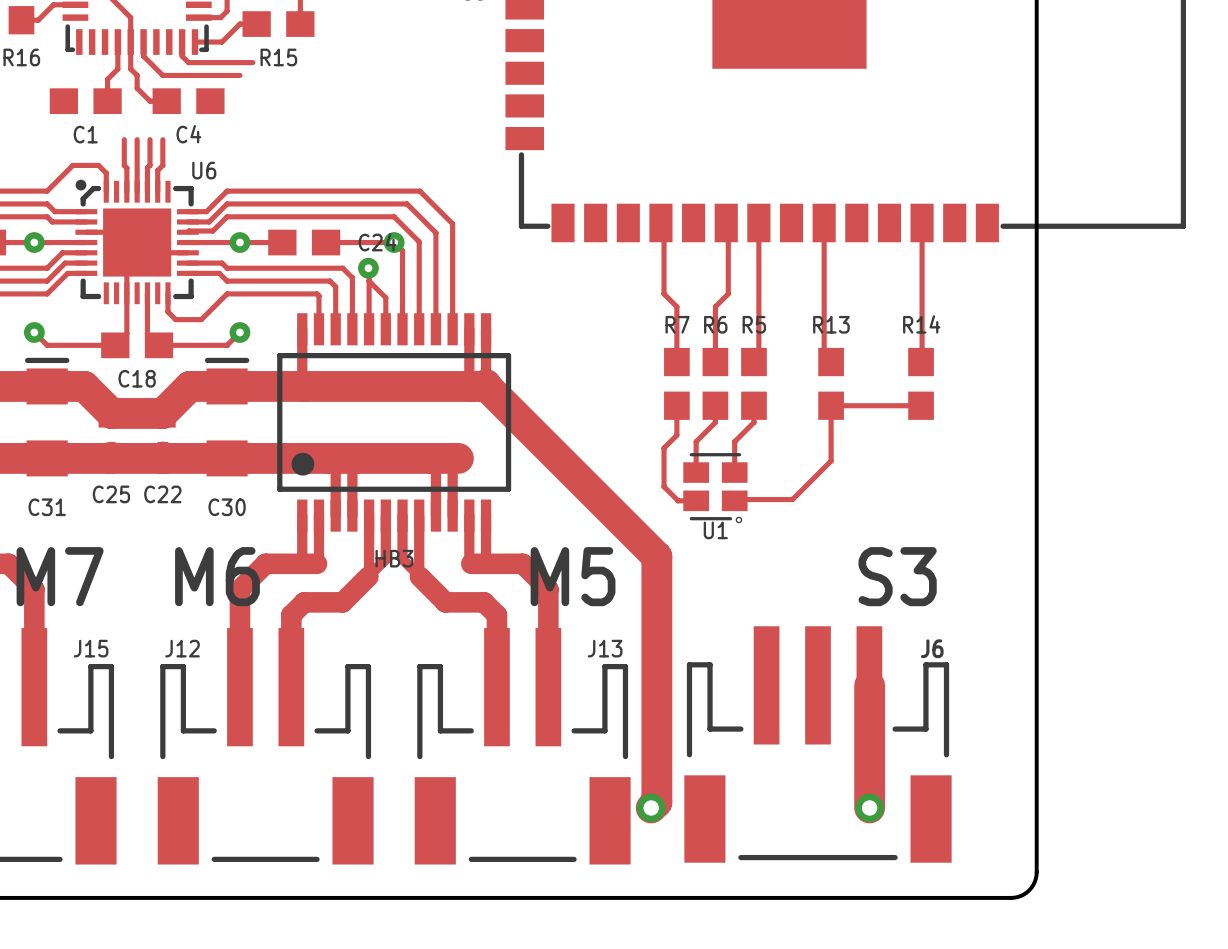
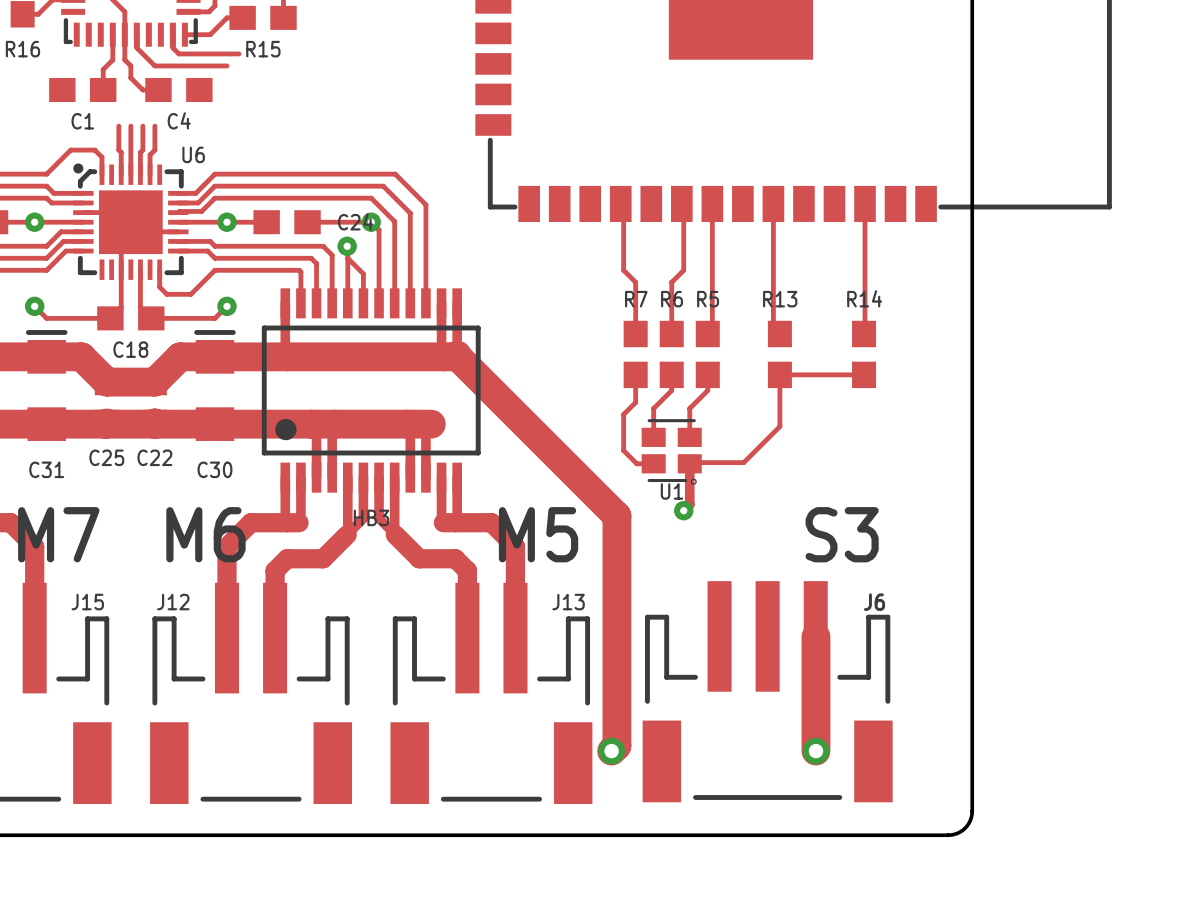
track: none -> (689, 463) (689, 504) (683, 510)
via: none -> (683, 510)

